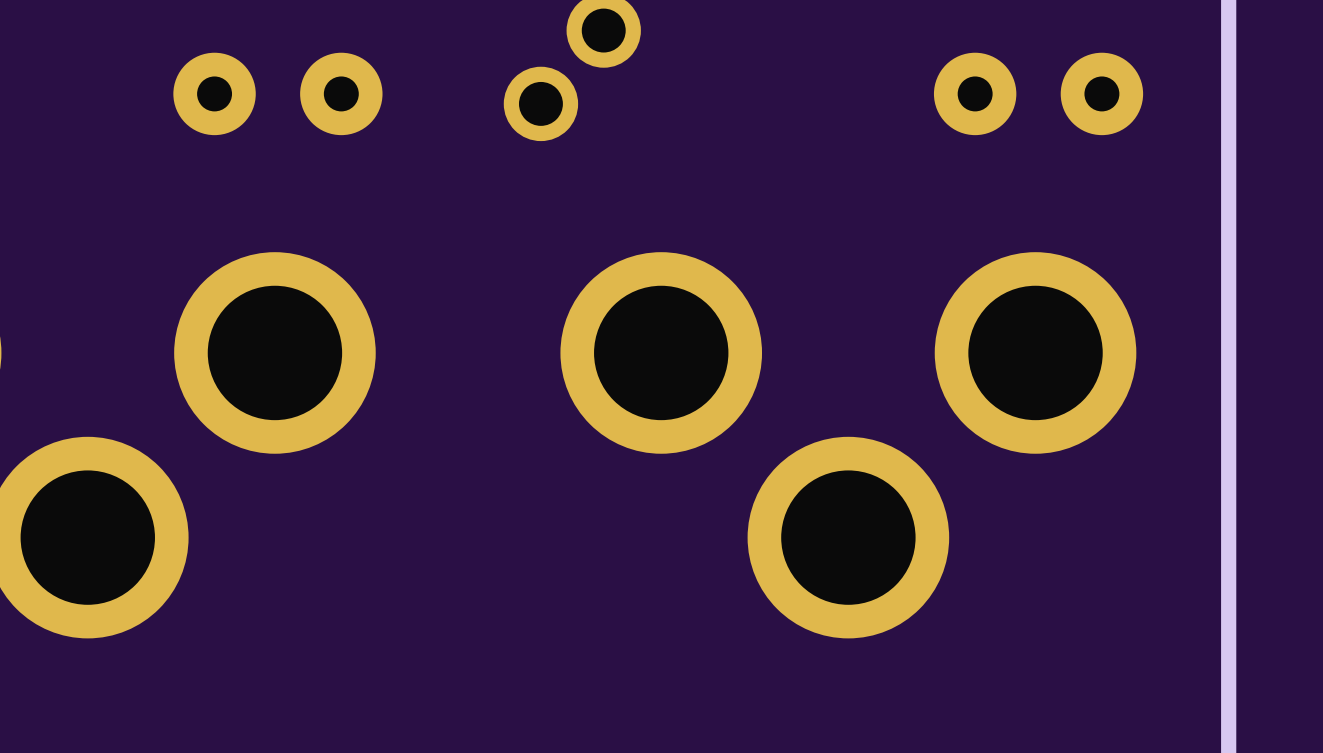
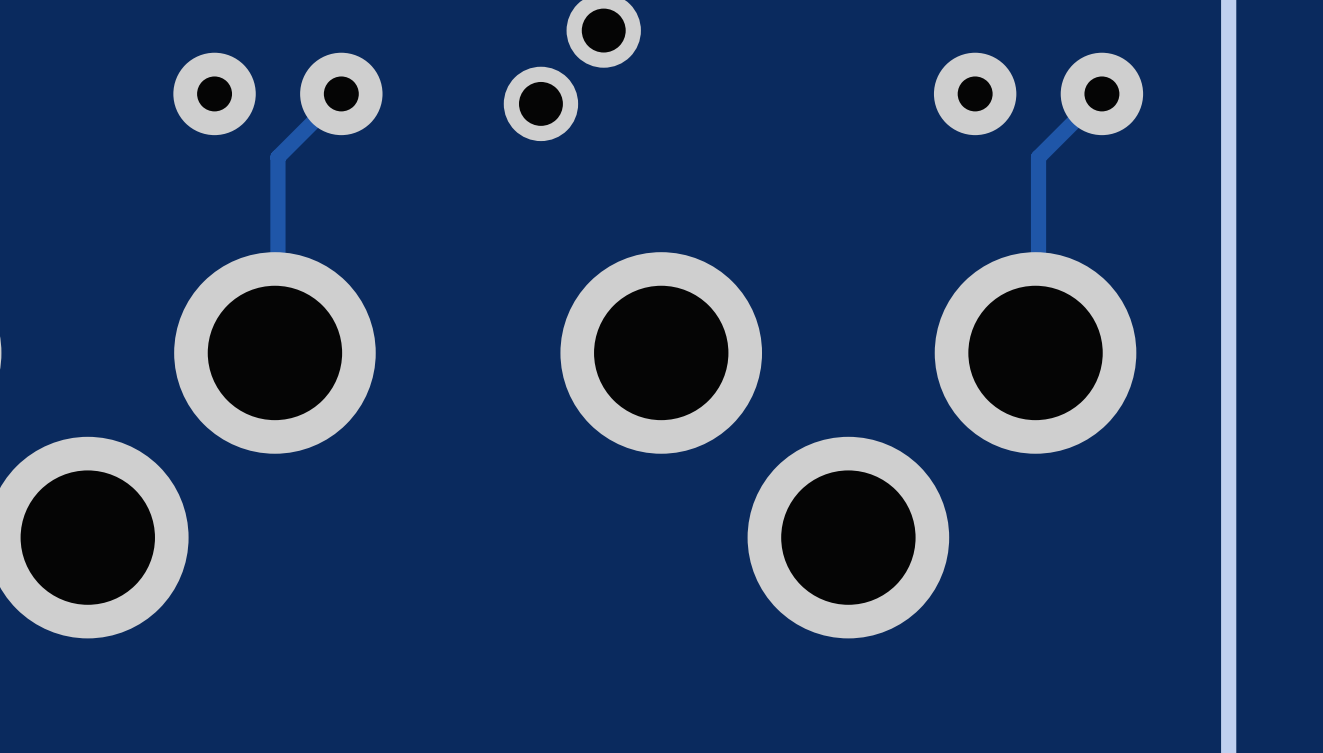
track: none -> (341, 93) (277, 157) (277, 347) (274, 352)
track: none -> (1101, 93) (1038, 157) (1038, 347) (1035, 352)

